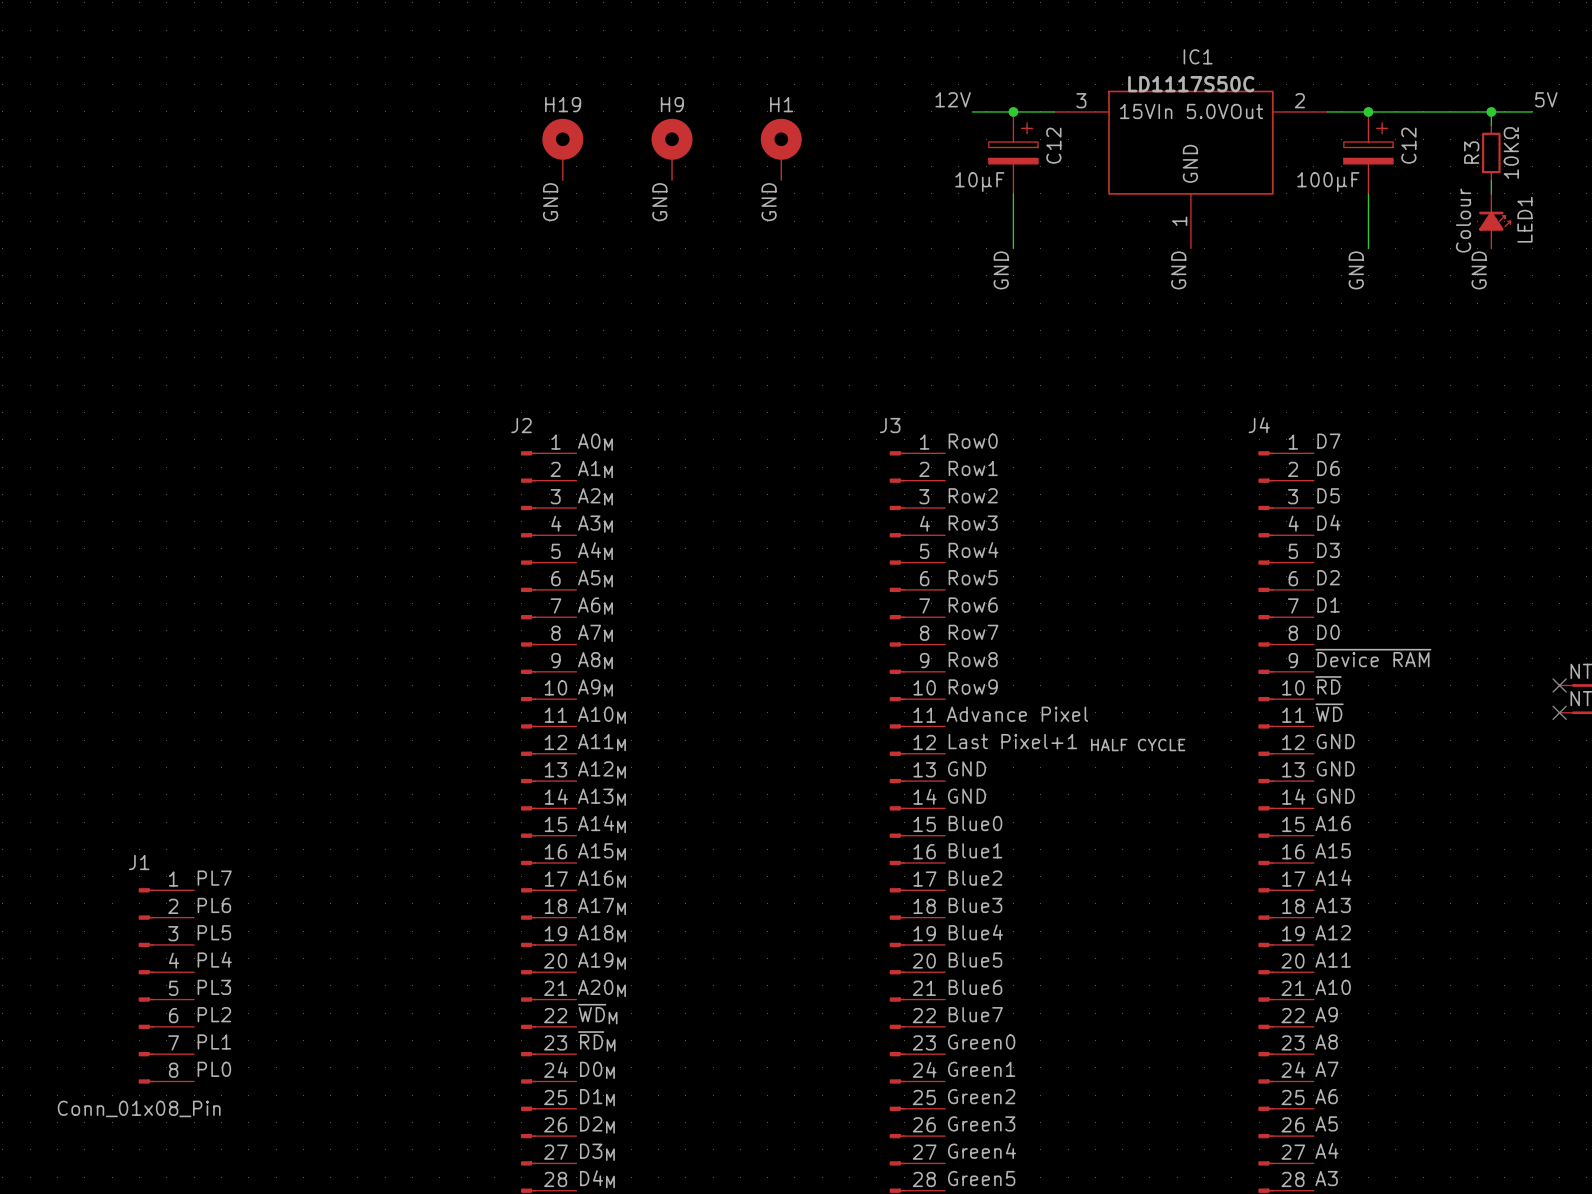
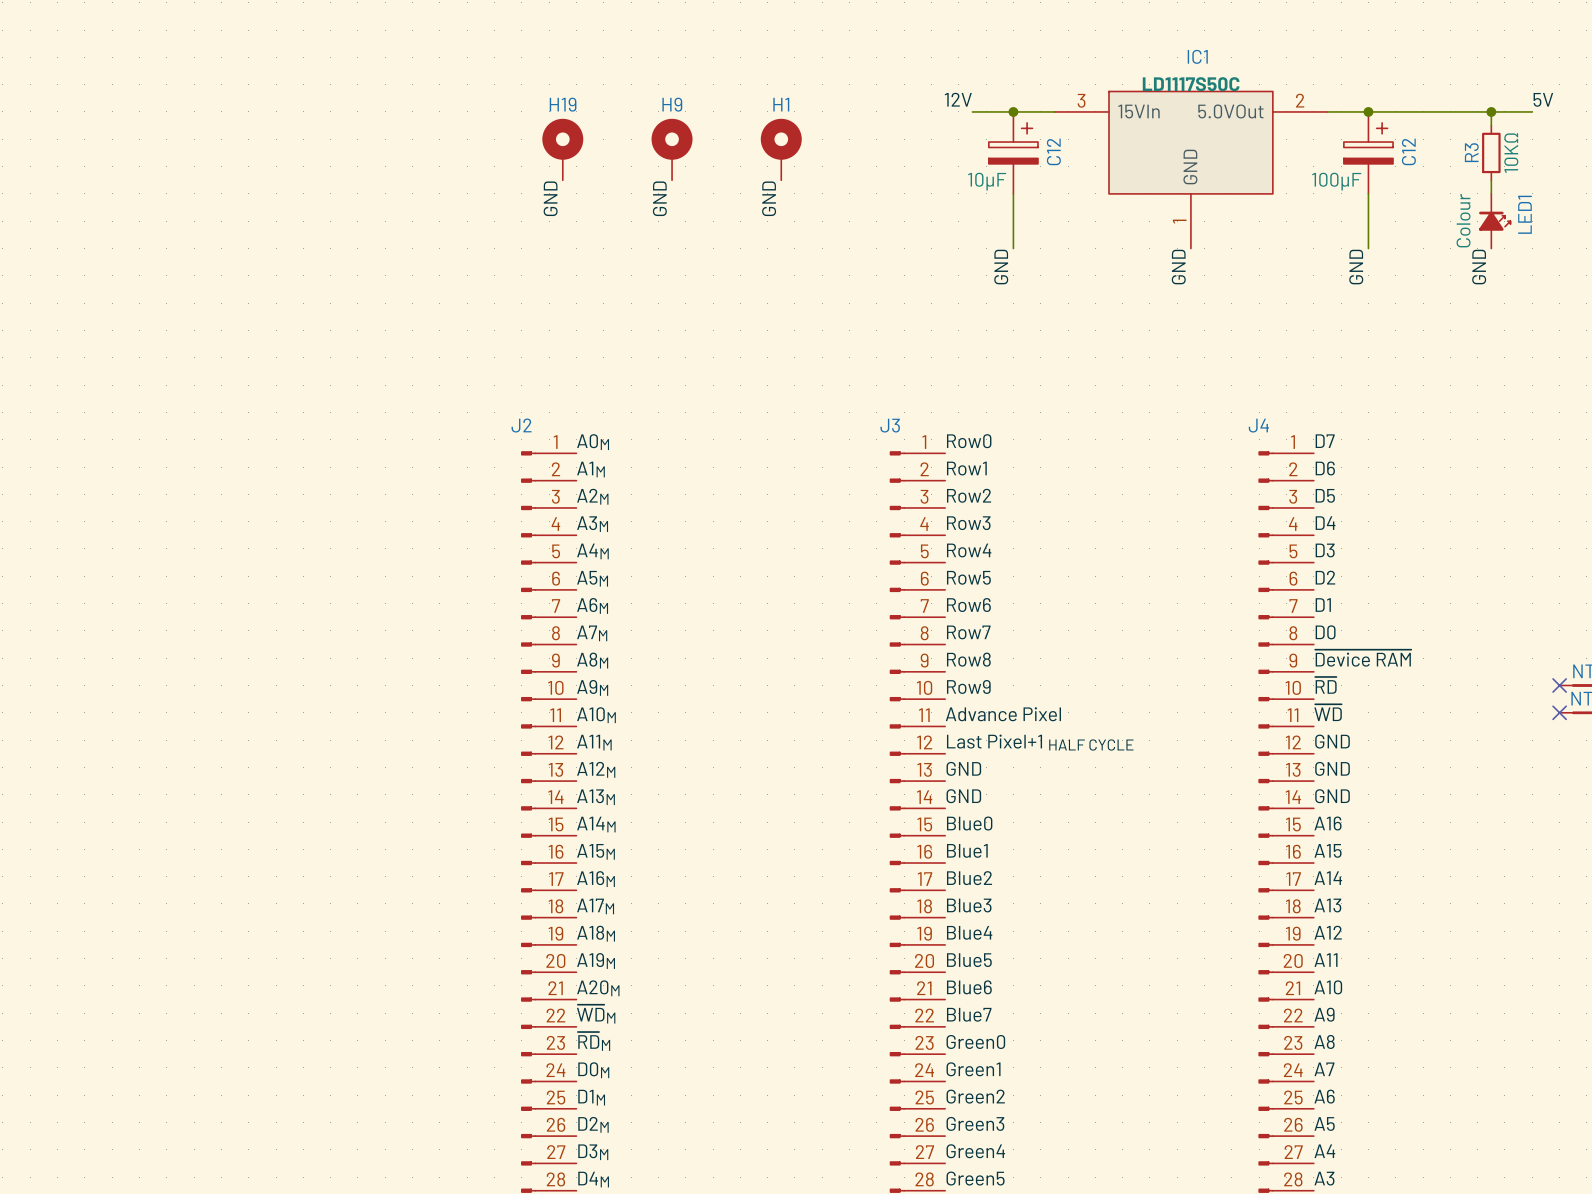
label: PL7 (214, 878) -> none
label: PL6 (214, 905) -> none
label: PL5 (214, 932) -> none
label: PL4 (214, 959) -> none
J1: Conn_01x08_Pin (166, 985) -> none
label: PL3 (214, 987) -> none
label: PL2 (214, 1014) -> none
label: PL1 (214, 1041) -> none
label: PL0 (214, 1069) -> none

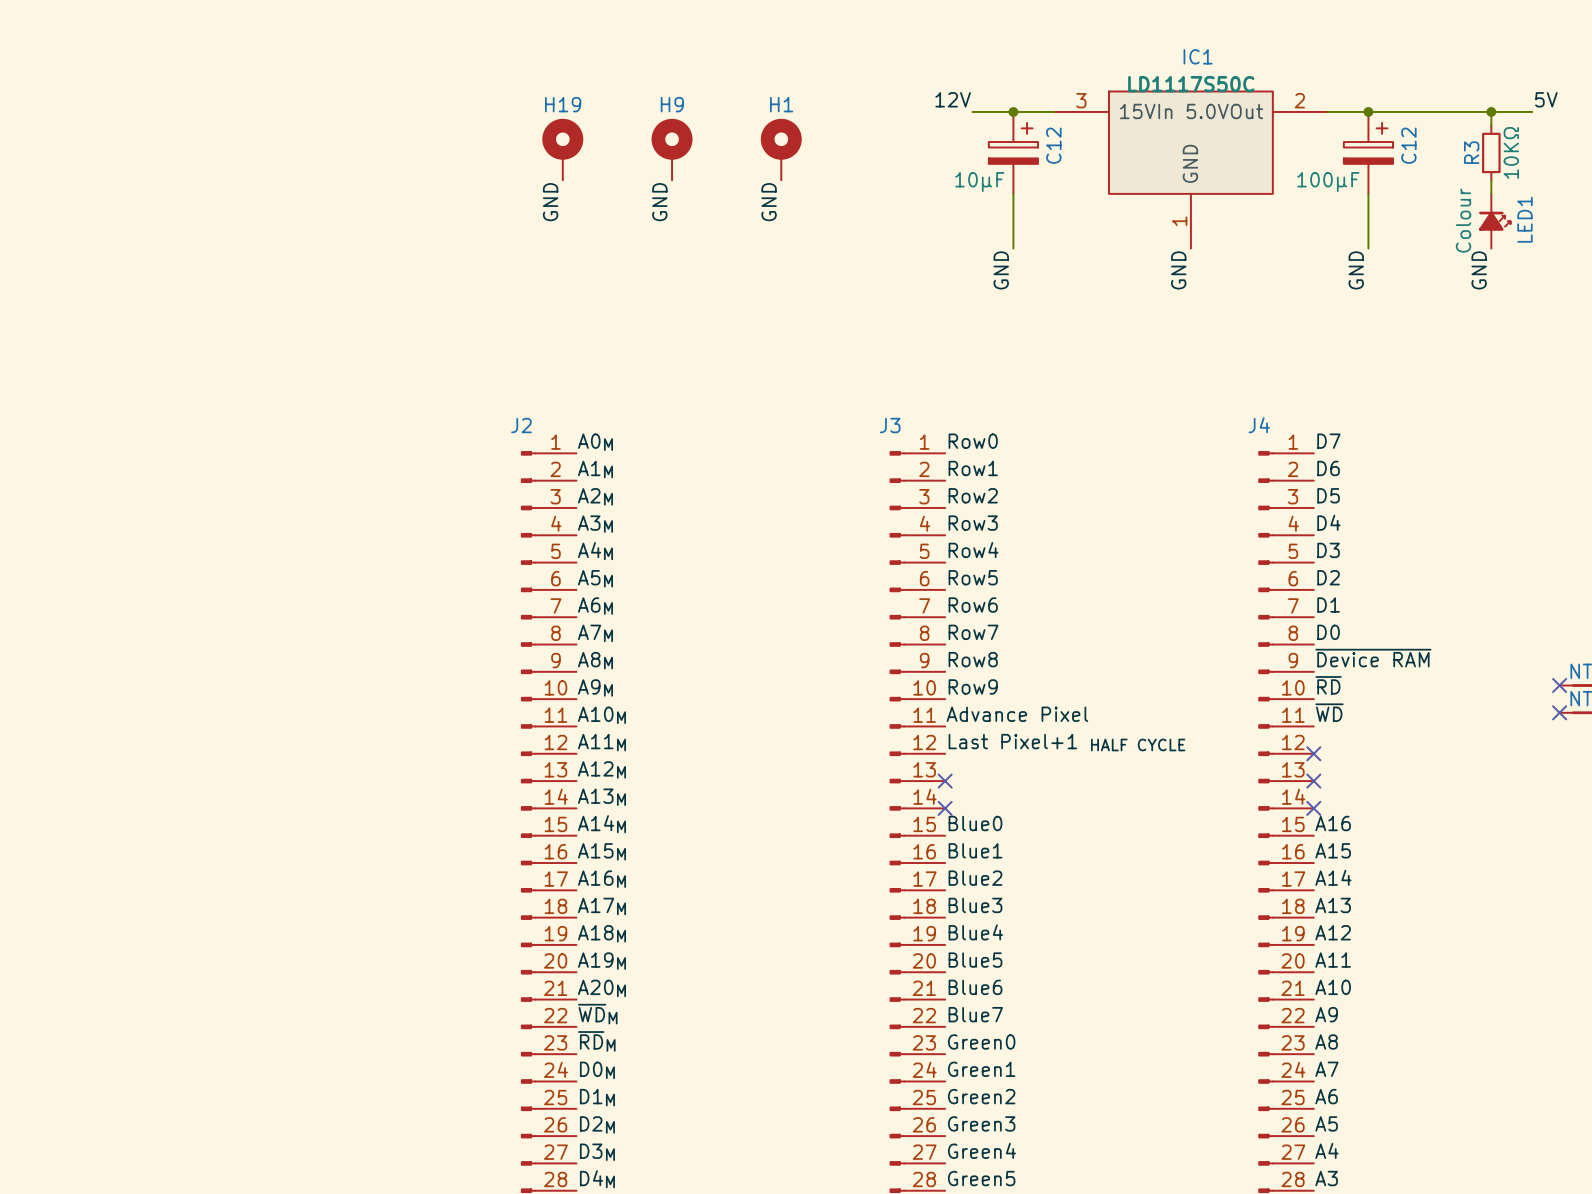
label: GND (1332, 741) -> none
no-connect mark: none -> (1313, 753)
label: GND (963, 768) -> none
label: GND (1332, 768) -> none
no-connect mark: none -> (945, 781)
no-connect mark: none -> (1313, 781)
label: GND (963, 796) -> none
label: GND (1332, 796) -> none
no-connect mark: none -> (945, 808)
no-connect mark: none -> (1313, 808)

